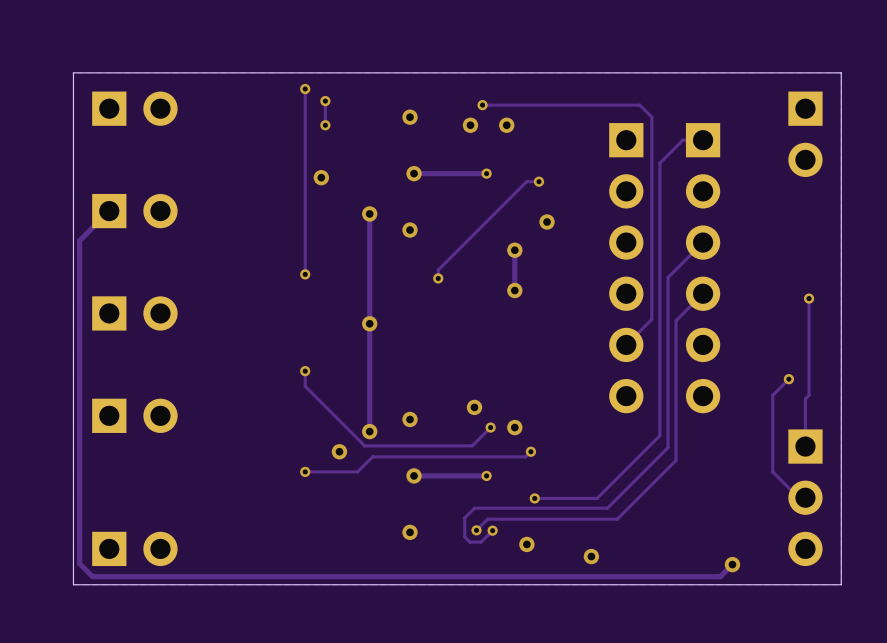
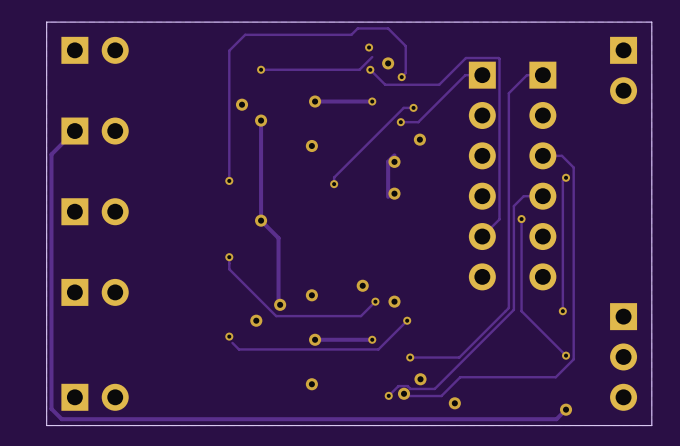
track: (305, 88) (305, 109) -> (401, 77) (405, 73) (405, 46) (388, 28) (357, 28) (351, 34) (245, 34) (229, 50)
via: (305, 88) -> none
track: (325, 101) (325, 125) -> none
via: (325, 101) -> none
track: (482, 105) (639, 105) (651, 117) (651, 319) (648, 323) -> (370, 69) (385, 84) (439, 84) (465, 58) (499, 58) (499, 219)
via: (410, 117) -> none
track: none -> (372, 57) (359, 69) (261, 69)
via: (325, 125) -> none
via: (470, 125) -> none
via: none -> (261, 69)
via: none -> (370, 69)
track: none -> (482, 75) (465, 75) (418, 122) (400, 122)
via: none -> (401, 77)
track: none -> (261, 120) (261, 220) (278, 238) (278, 306)
via: none -> (400, 122)
track: (369, 213) (369, 431) -> none
via position: (369, 213) -> (261, 120)
track: none -> (394, 155) (388, 161) (388, 196)
track: (703, 242) (667, 277) (667, 447) (607, 508) (474, 508) (464, 517) (464, 537) (469, 542) (481, 542) (492, 530) -> (542, 155) (561, 155) (573, 167) (573, 359) (555, 377) (460, 377) (441, 396) (403, 396)
track: (514, 250) (514, 290) -> none
track: none -> (566, 177) (562, 180) (562, 311)
via: none -> (566, 177)
track: (703, 293) (676, 322) -> (542, 196) (523, 196) (513, 206) (513, 309) (434, 388) (410, 388) (407, 386) (398, 386) (388, 395)
track: (809, 298) (809, 395) (805, 398) (805, 446) -> none
via: (809, 298) -> none
via: none -> (521, 219)
via position: (369, 323) -> (261, 220)
track: (788, 379) (772, 395) (772, 471) (798, 497) (805, 497) -> none
via: (788, 379) -> none
track: (676, 439) (676, 460) (617, 519) (487, 519) (476, 530) -> (521, 311) (566, 355)
via: none -> (562, 311)
track: (525, 456) (372, 456) (357, 471) (305, 471) -> (403, 324) (378, 349) (238, 349) (232, 342)
via: none -> (566, 355)
via: none -> (420, 379)
via: (476, 530) -> none
via: (492, 530) -> none
via: none -> (388, 395)

